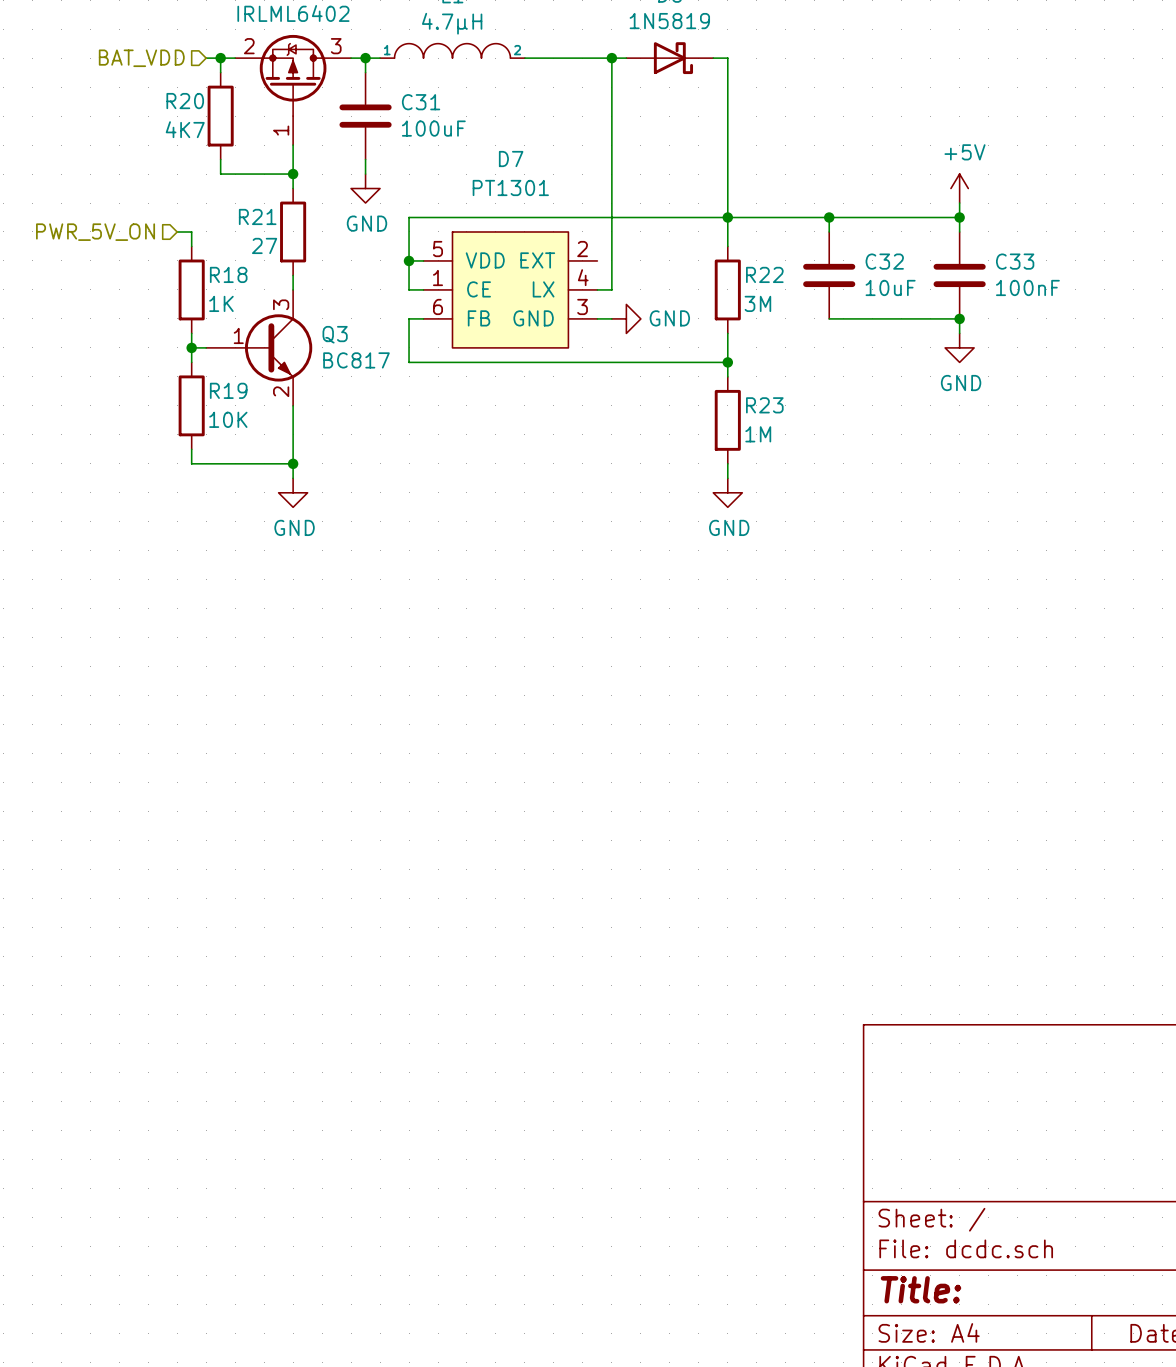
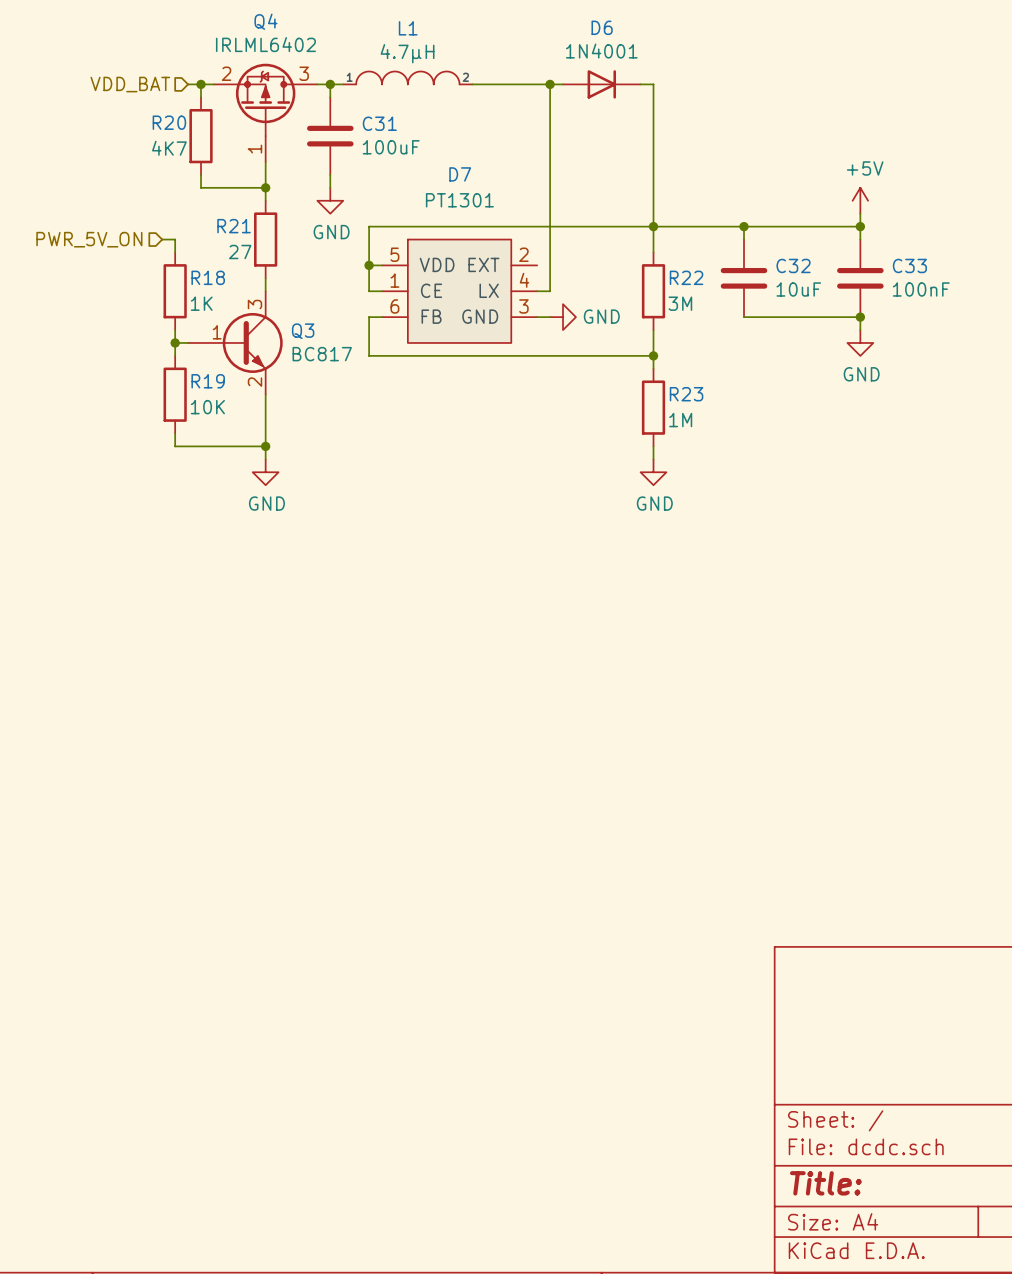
D6 value: 1N5819 (669, 21) -> 1N4001 (601, 51)
D6 symbol: [626, 42, 714, 75] -> [563, 70, 641, 99]
hierarchical label: BAT_VDD (141, 58) -> VDD_BAT (130, 84)

